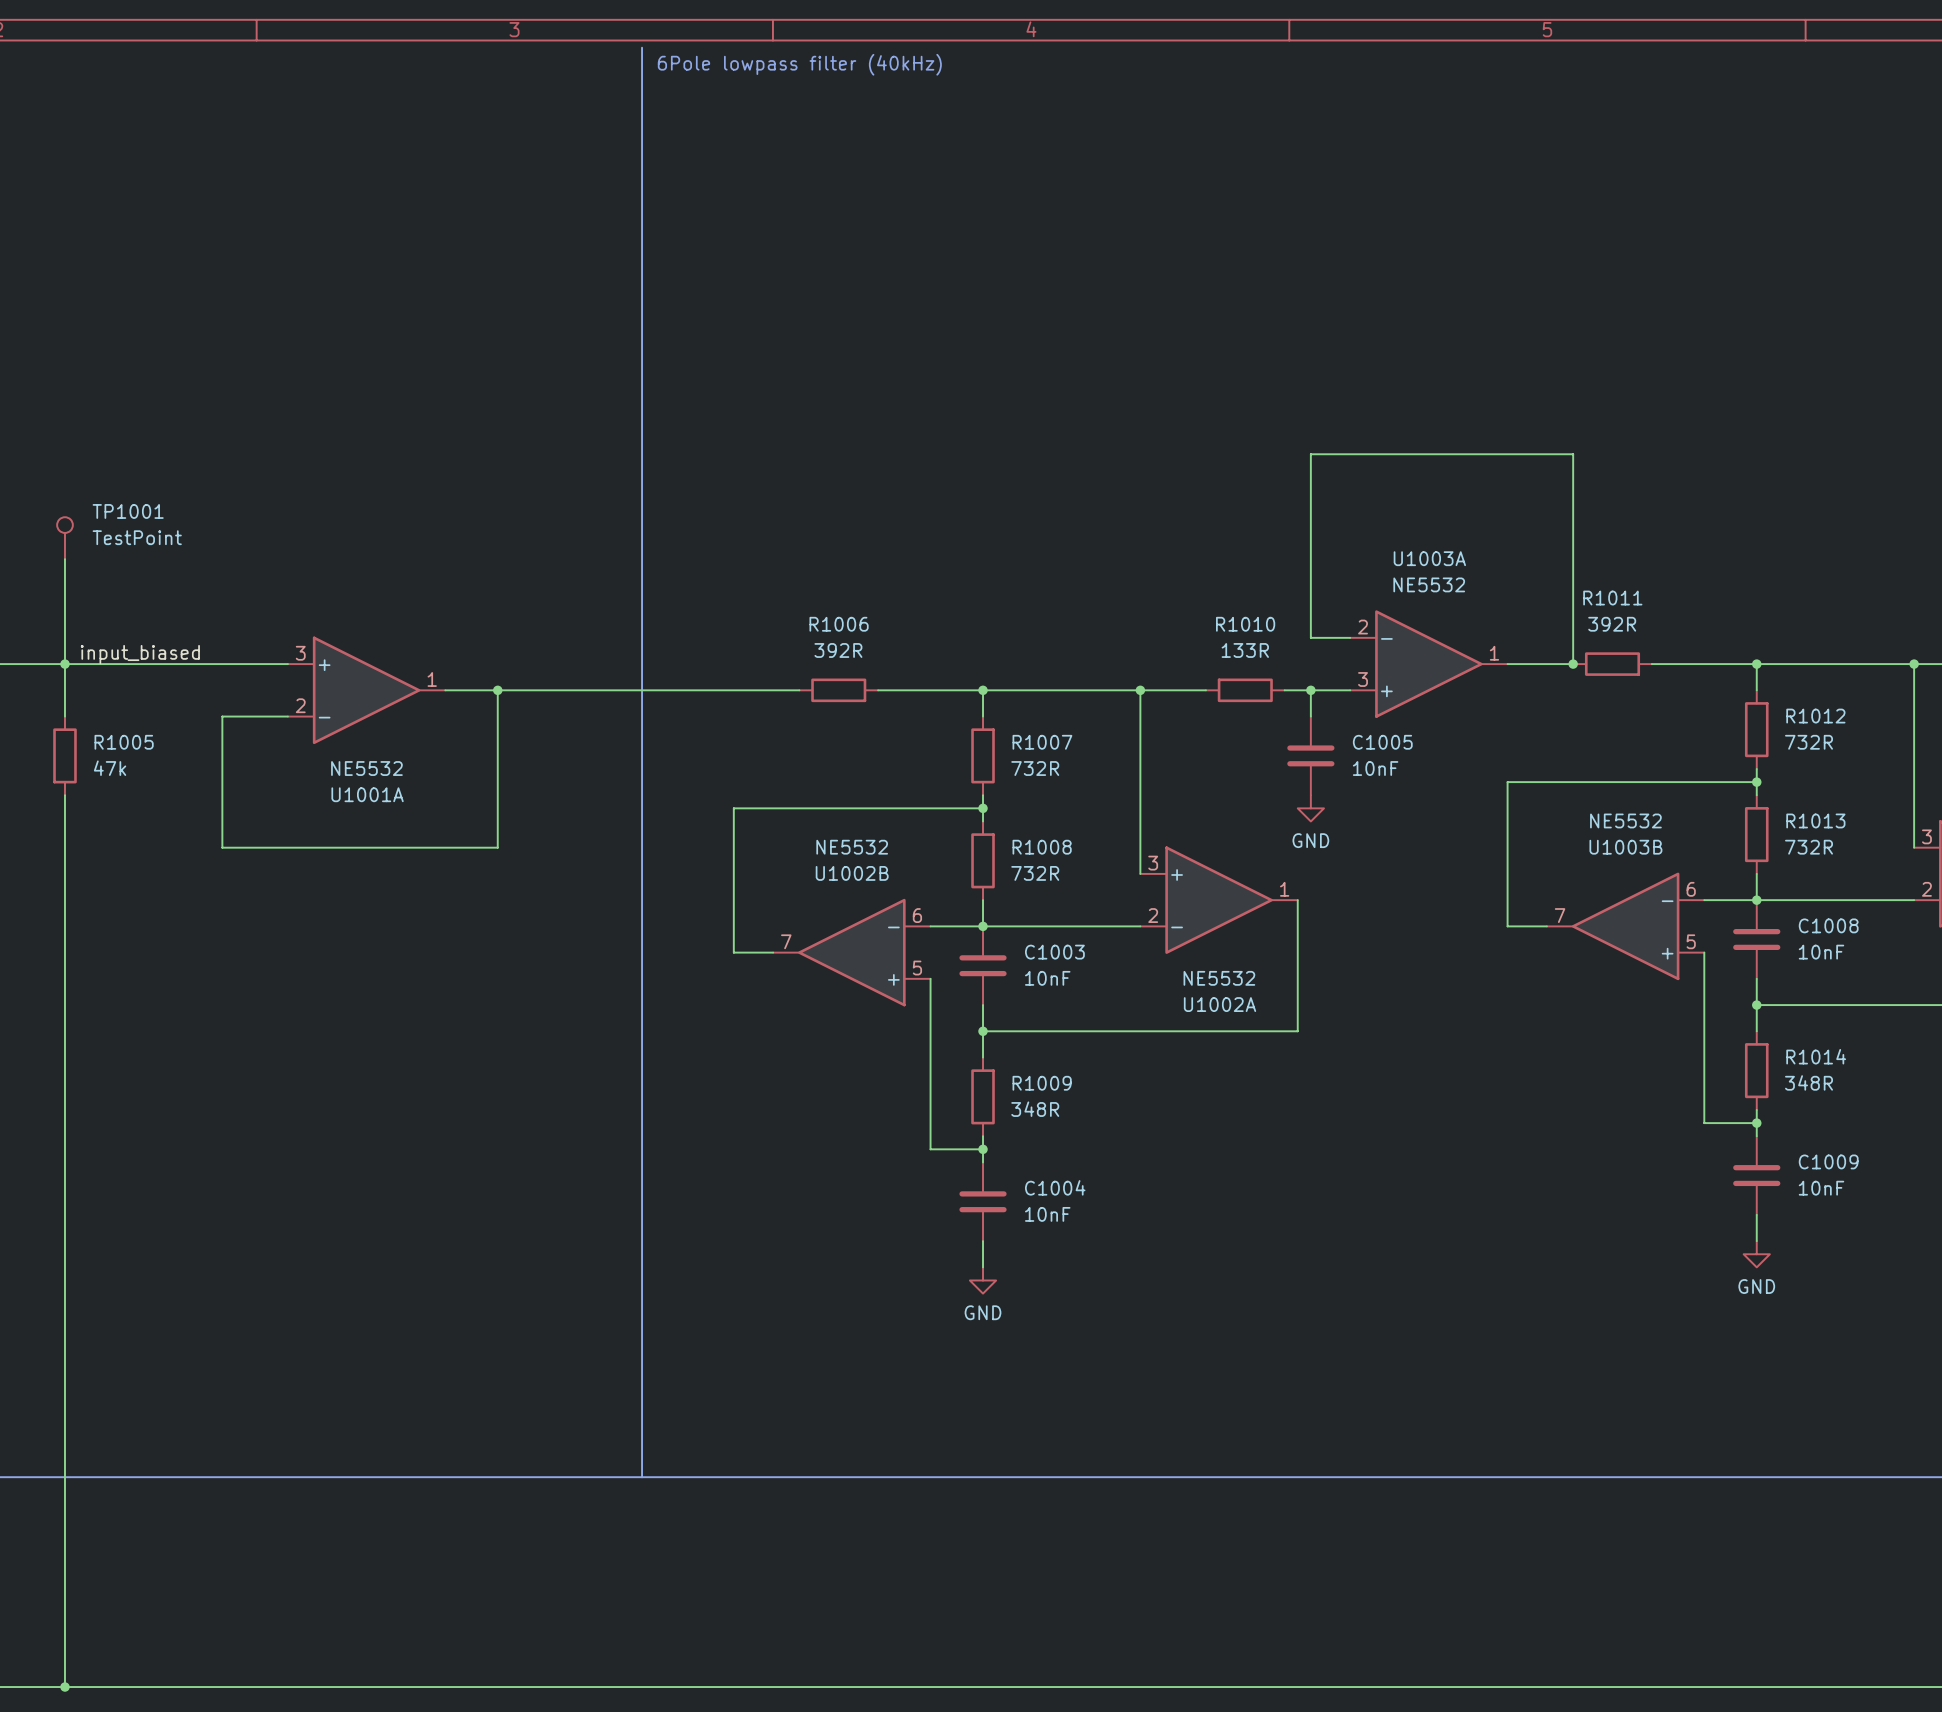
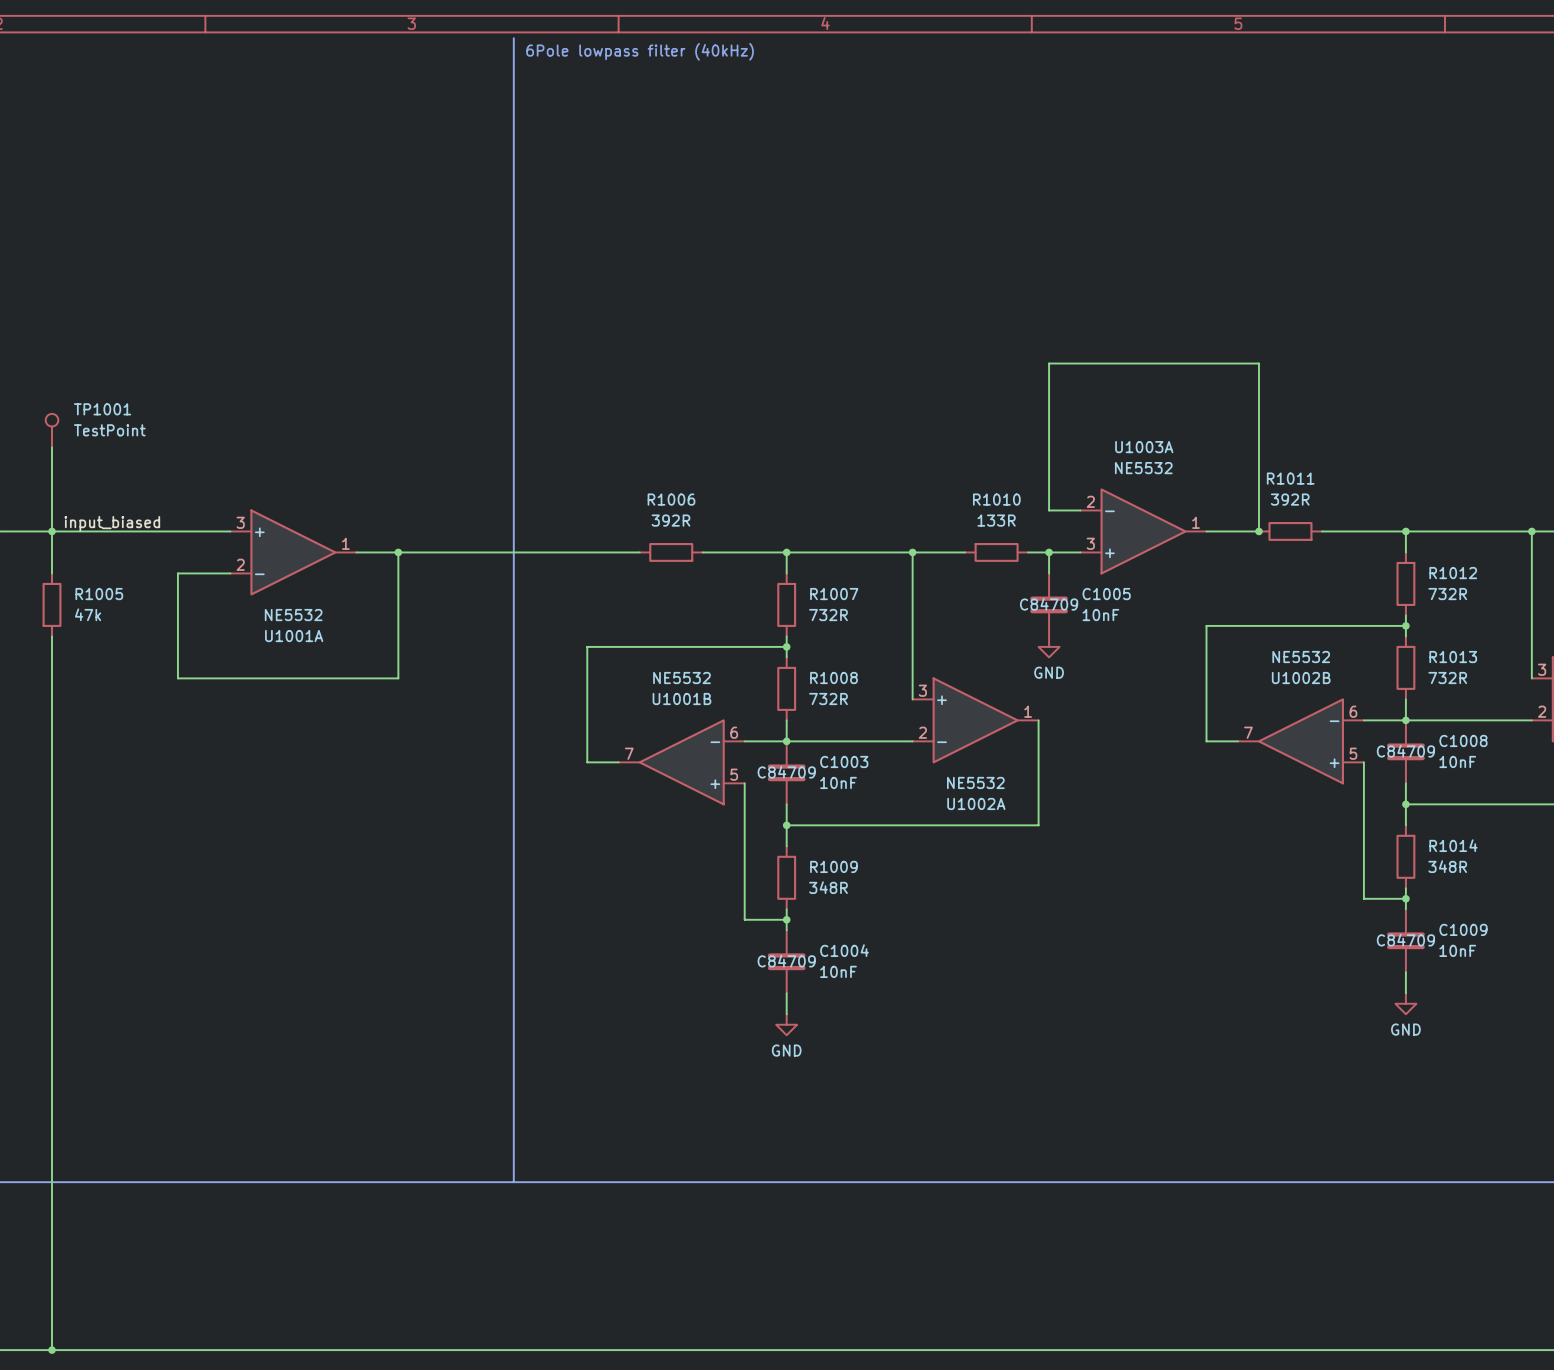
C1005 text: none -> C84709 (1049, 604)
U1003B name: U1003B (1625, 847) -> U1002B (1301, 678)
U1002B name: U1002B (852, 873) -> U1001B (681, 698)
C1008 text: none -> C84709 (1405, 751)
C1003 text: none -> C84709 (786, 772)
C1009 text: none -> C84709 (1405, 940)
C1004 text: none -> C84709 (786, 961)

